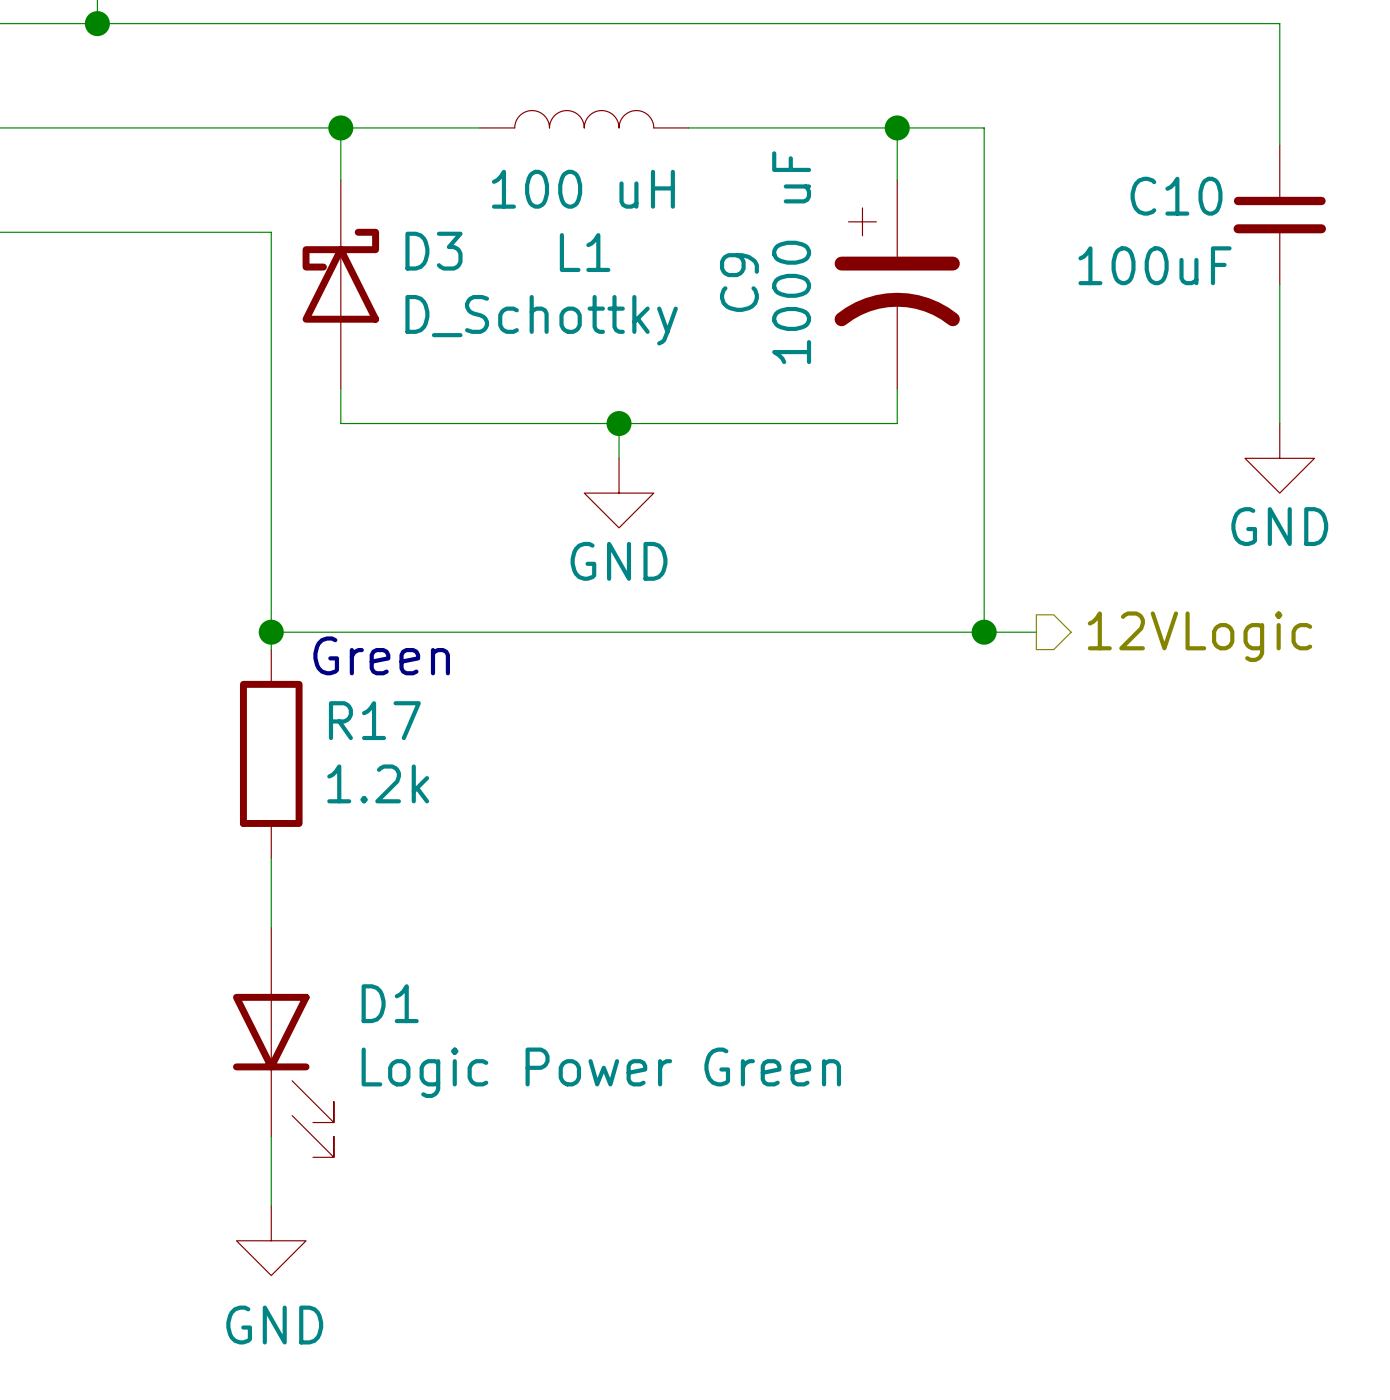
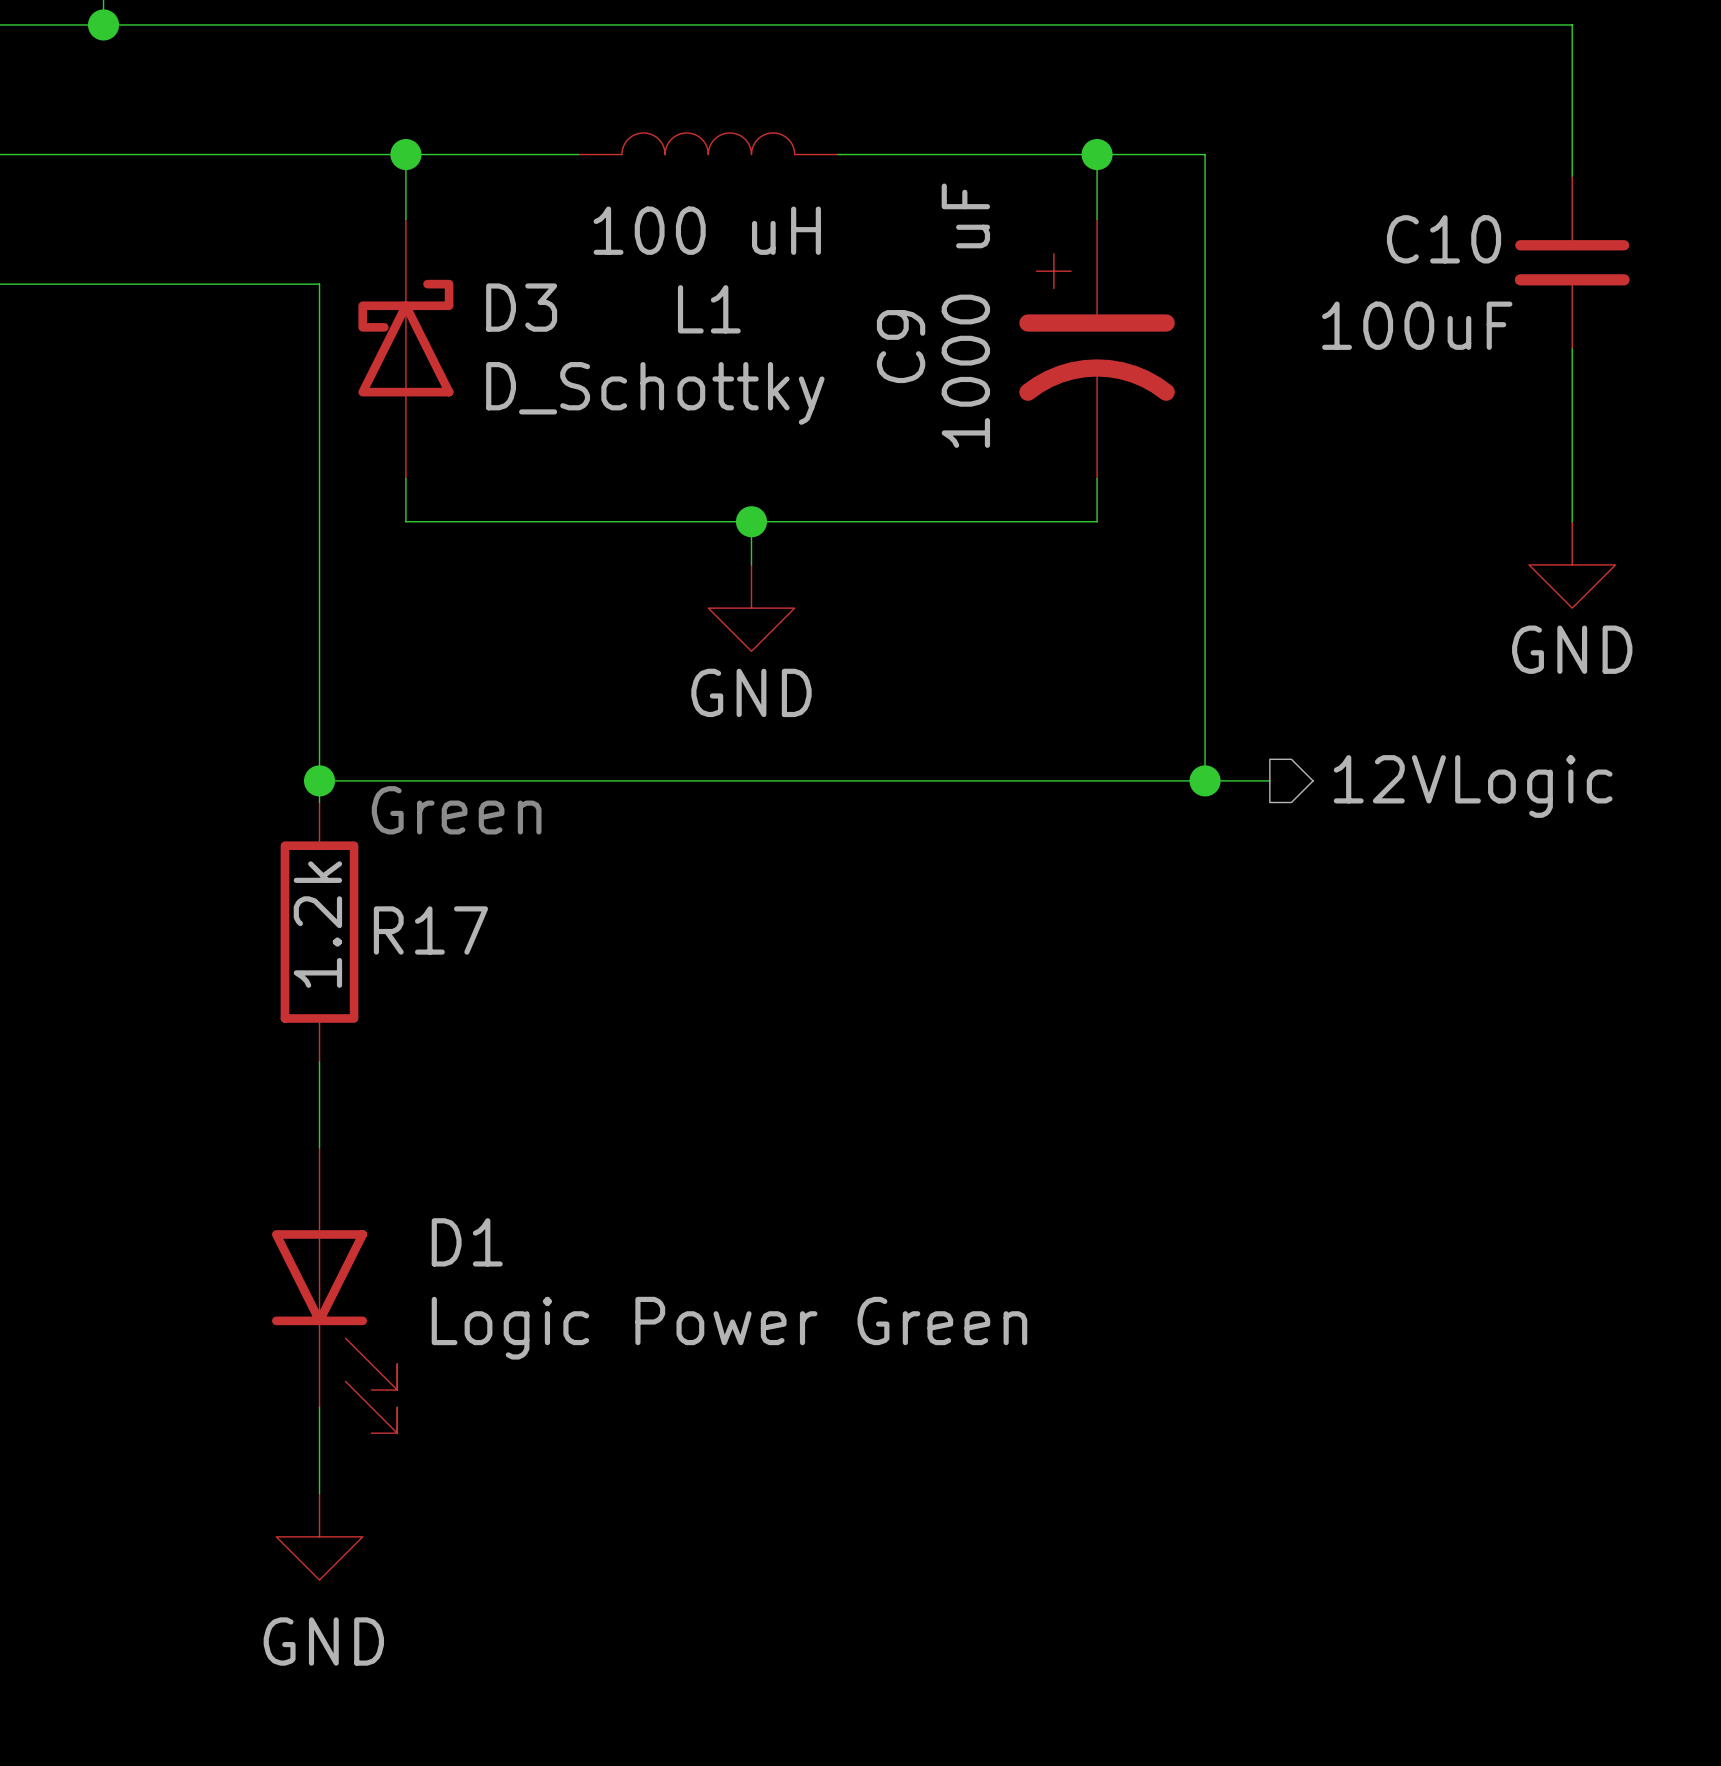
R17 name position: R17 (374, 720) -> R17 (430, 930)
R17 value rotation: 0° (378, 783) -> 90° counterclockwise (317, 924)

